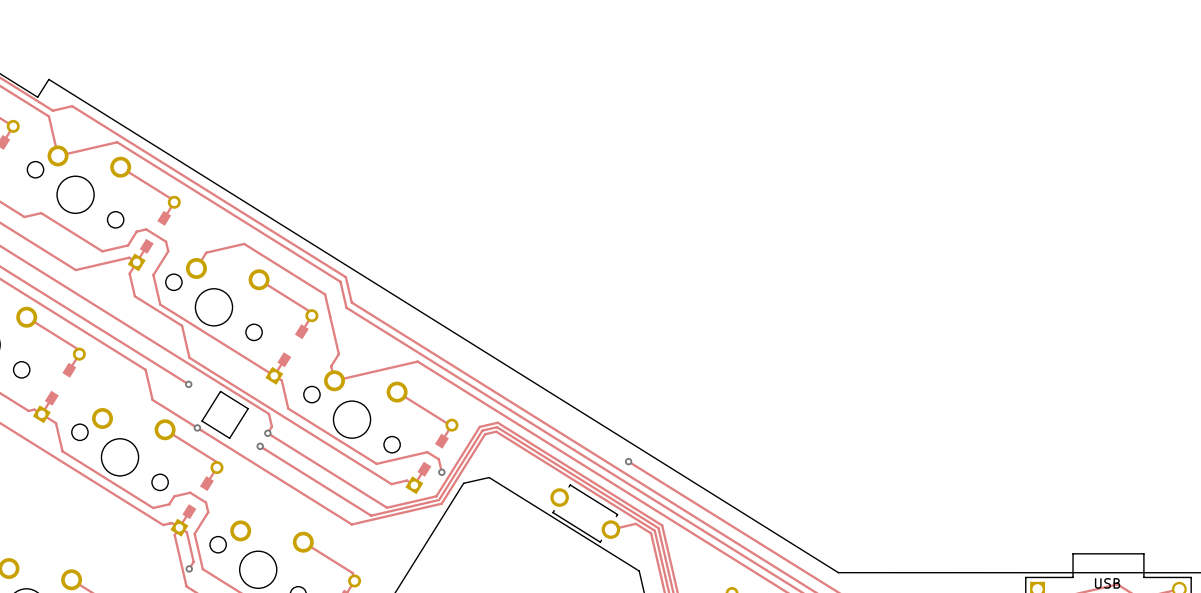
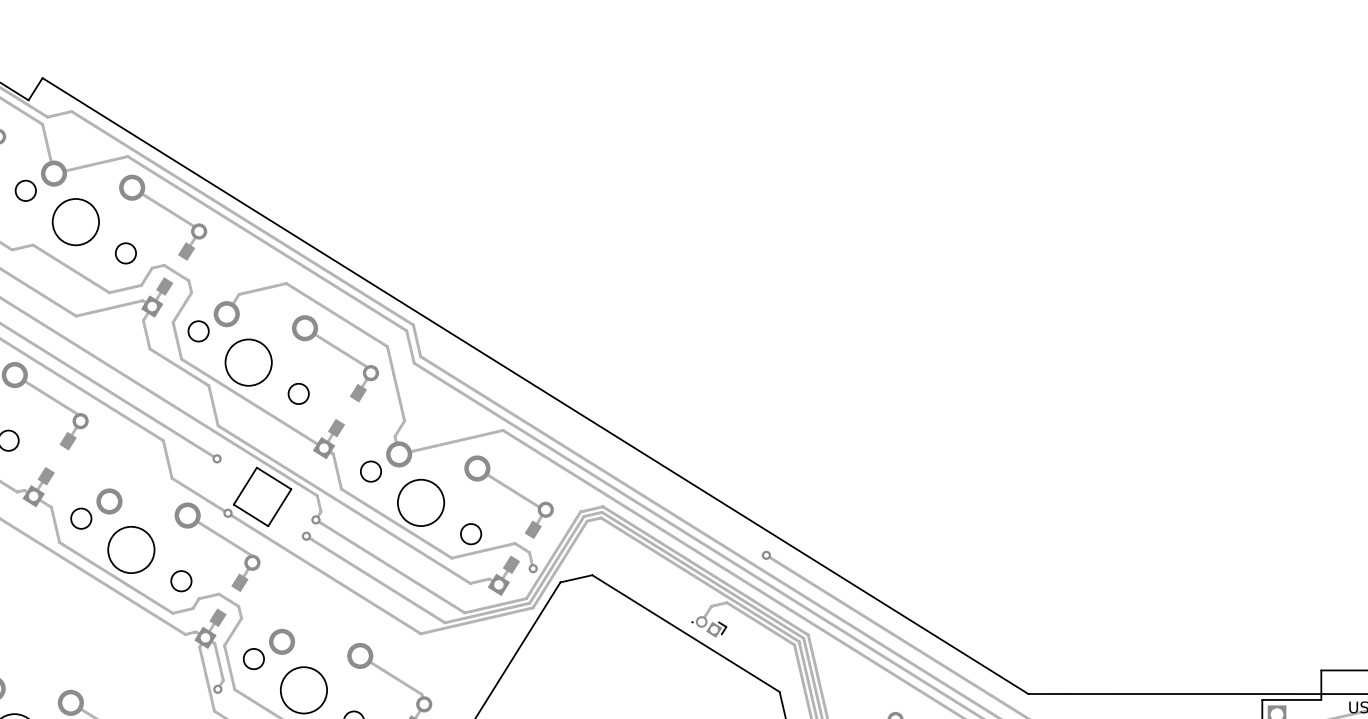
part footprint: [550, 484, 621, 543] -> [691, 616, 728, 638]
track: (610, 529) (635, 523) (651, 533) -> (701, 621) (711, 606) (727, 602) (794, 644)

